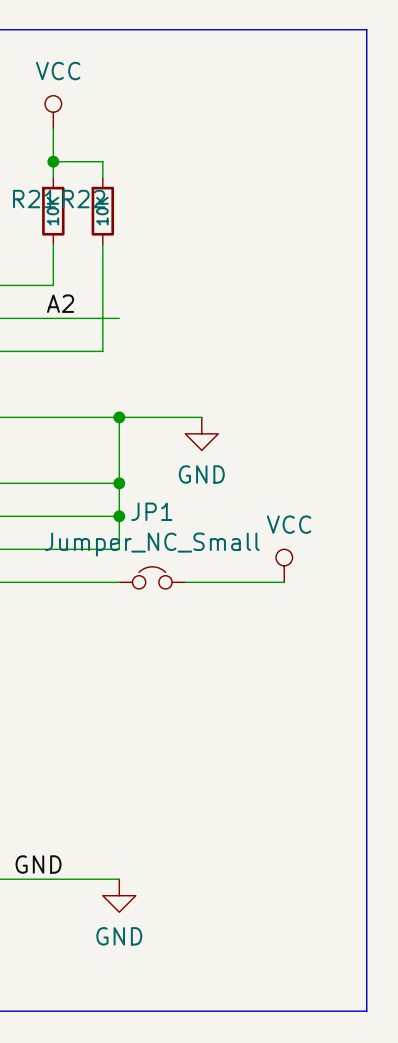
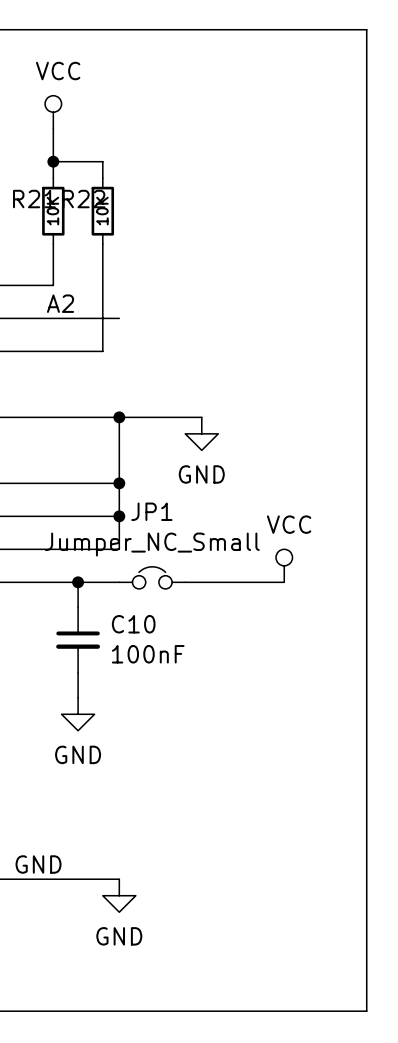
wire: none -> (78, 582) (78, 607)
junction: none -> (78, 582)
C10: none -> 100nF (78, 640)
wire: none -> (78, 673) (78, 697)
power symbol: none -> GND (78, 714)

